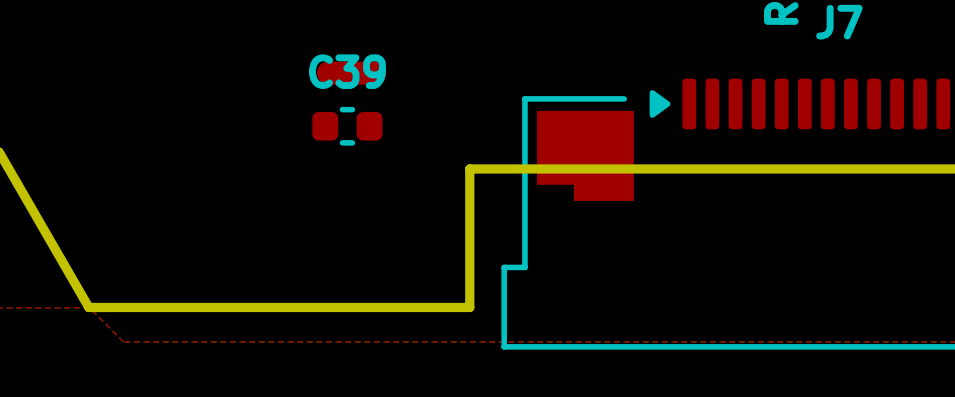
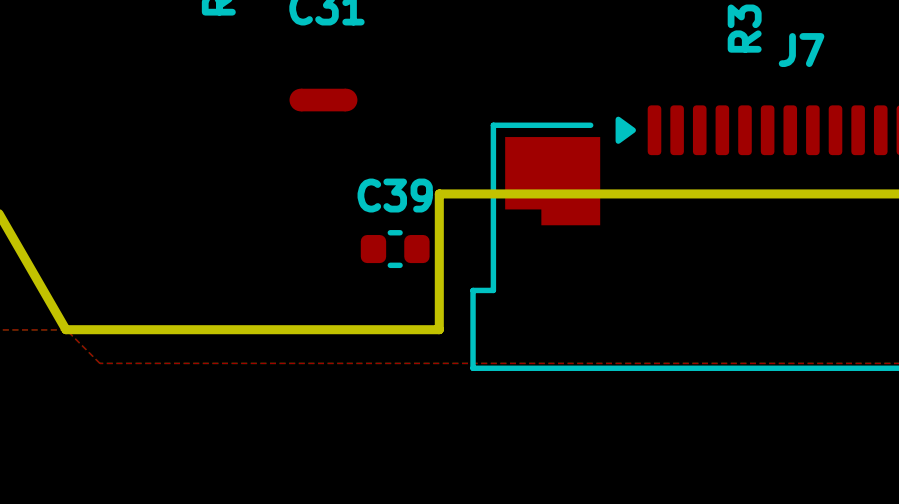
C39 position: (347, 126) -> (395, 249)

